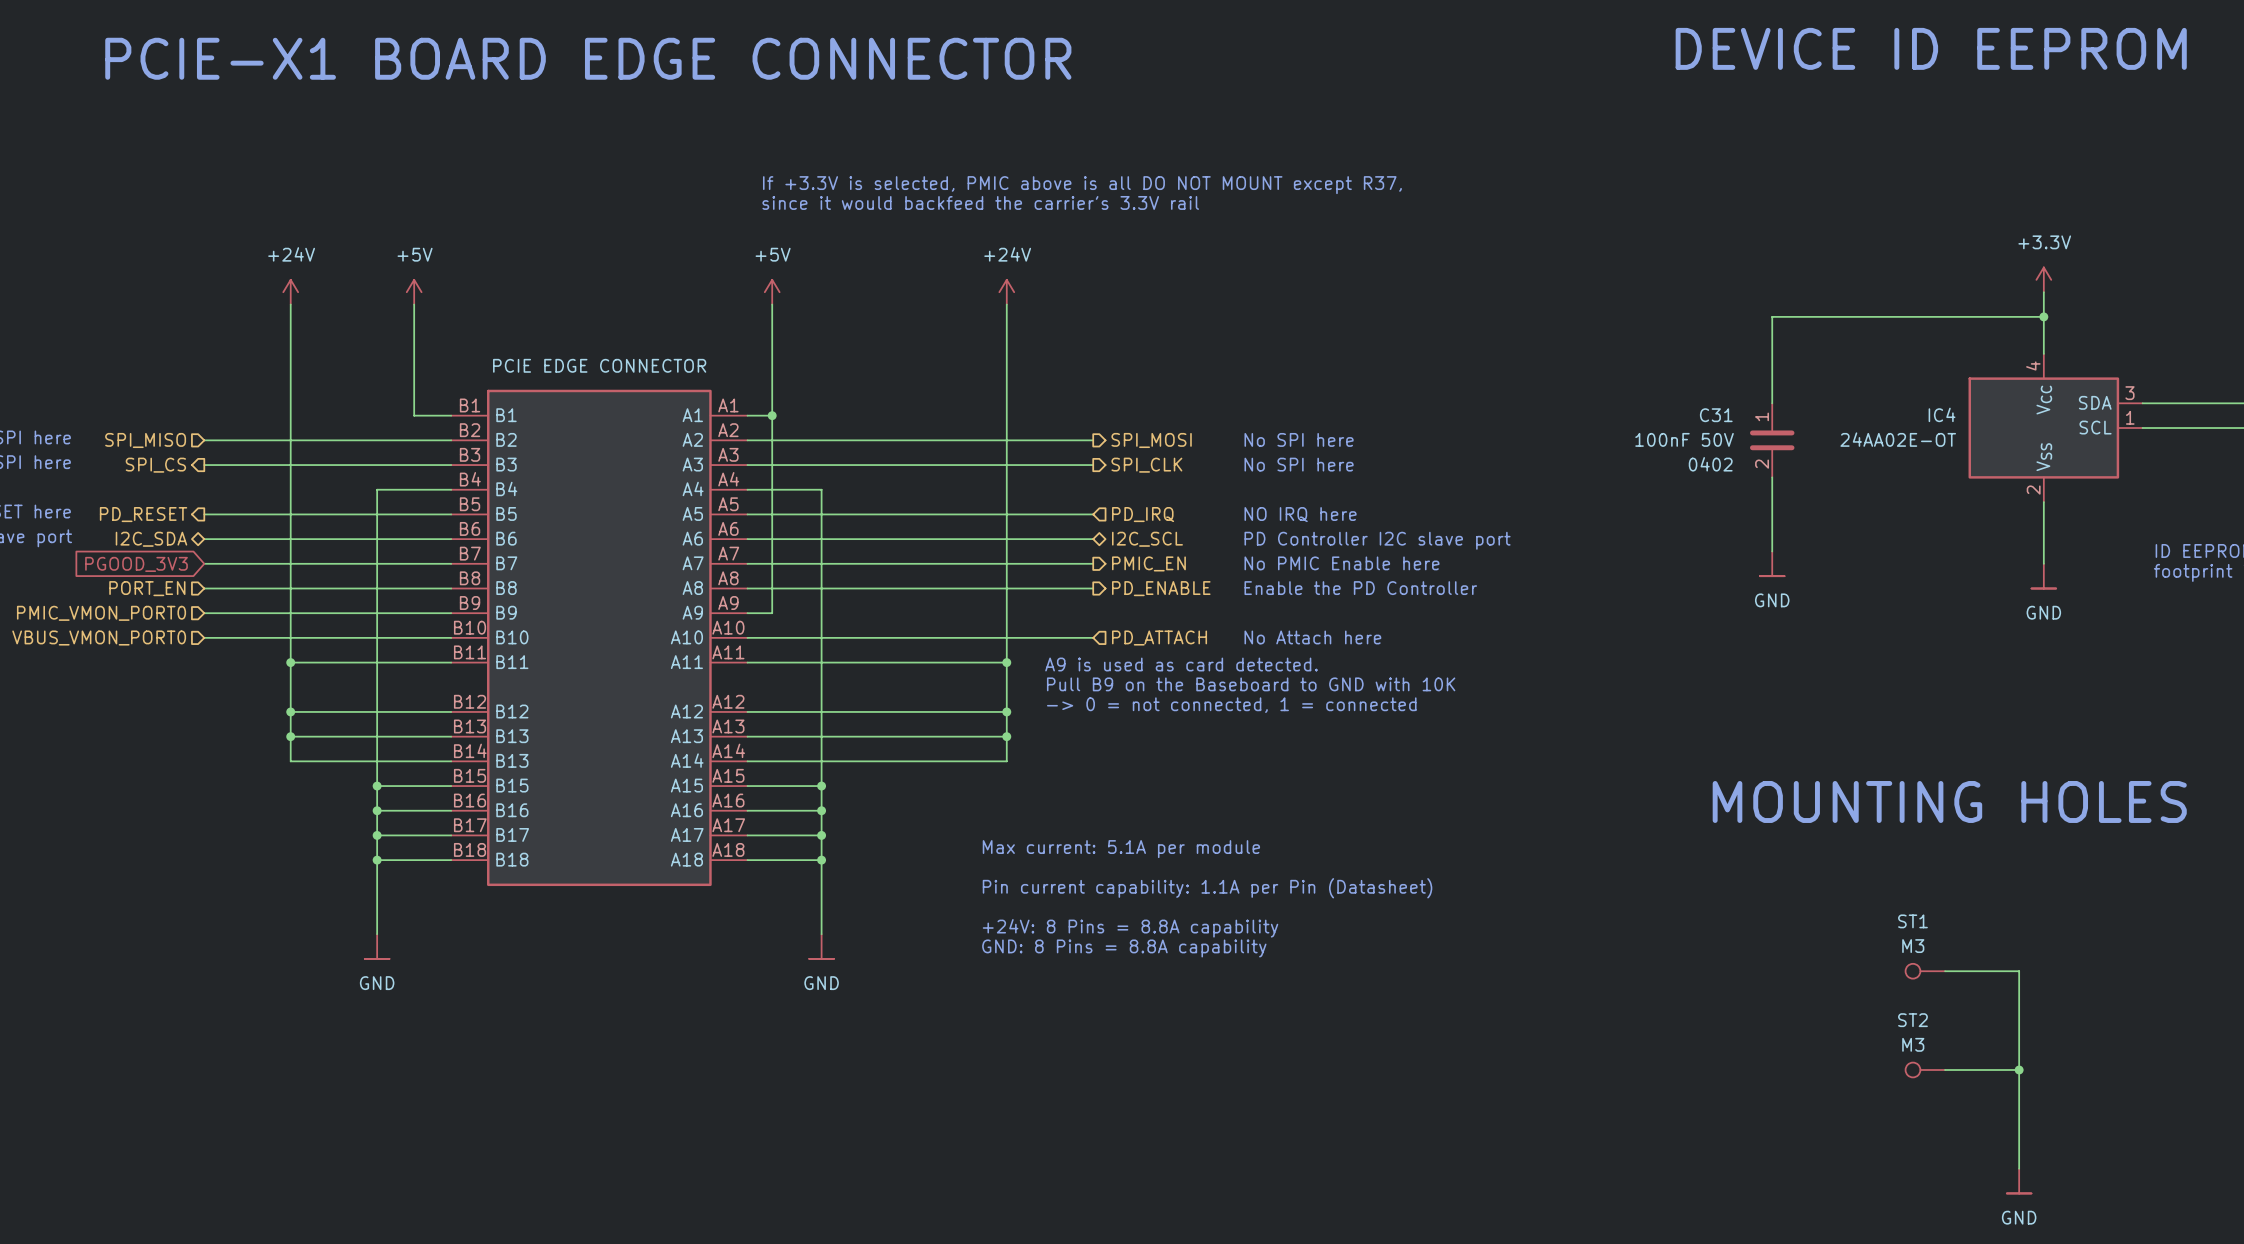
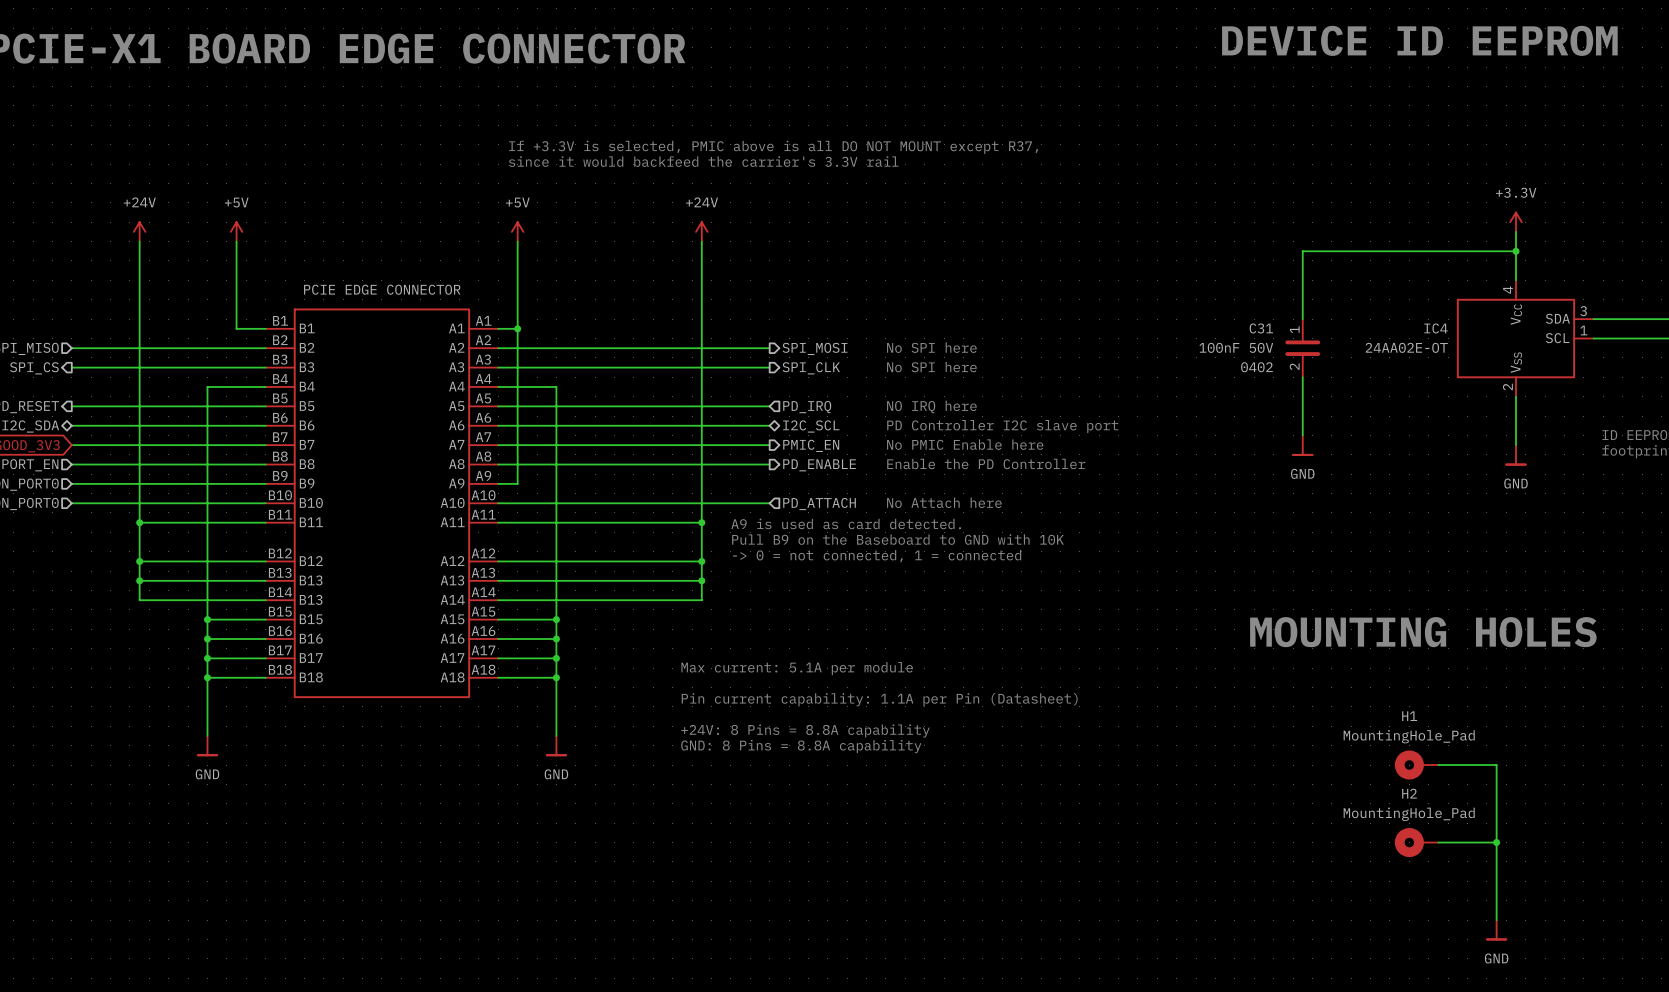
H1: none -> MountingHole_Pad (1416, 765)
ST1: M3 (1925, 971) -> none
H2: none -> MountingHole_Pad (1416, 842)
ST2: M3 (1925, 1070) -> none

